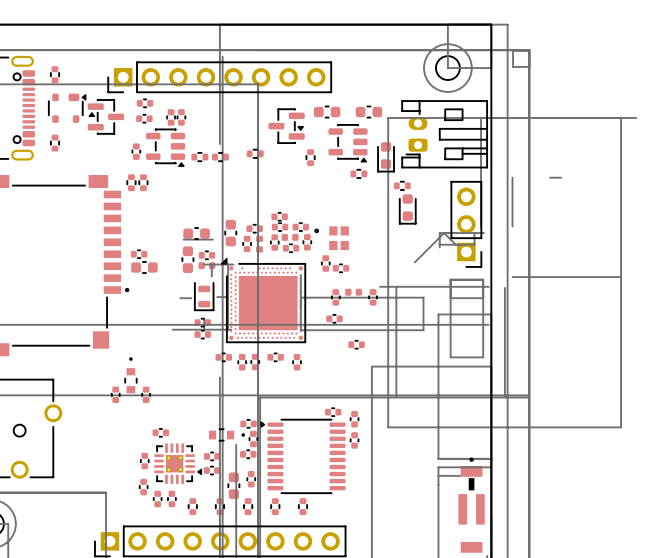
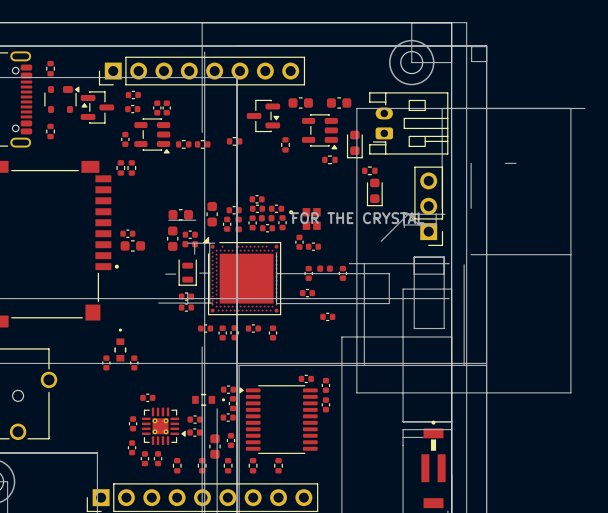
text: none -> FOR THE CRYSTAL (358, 218)

